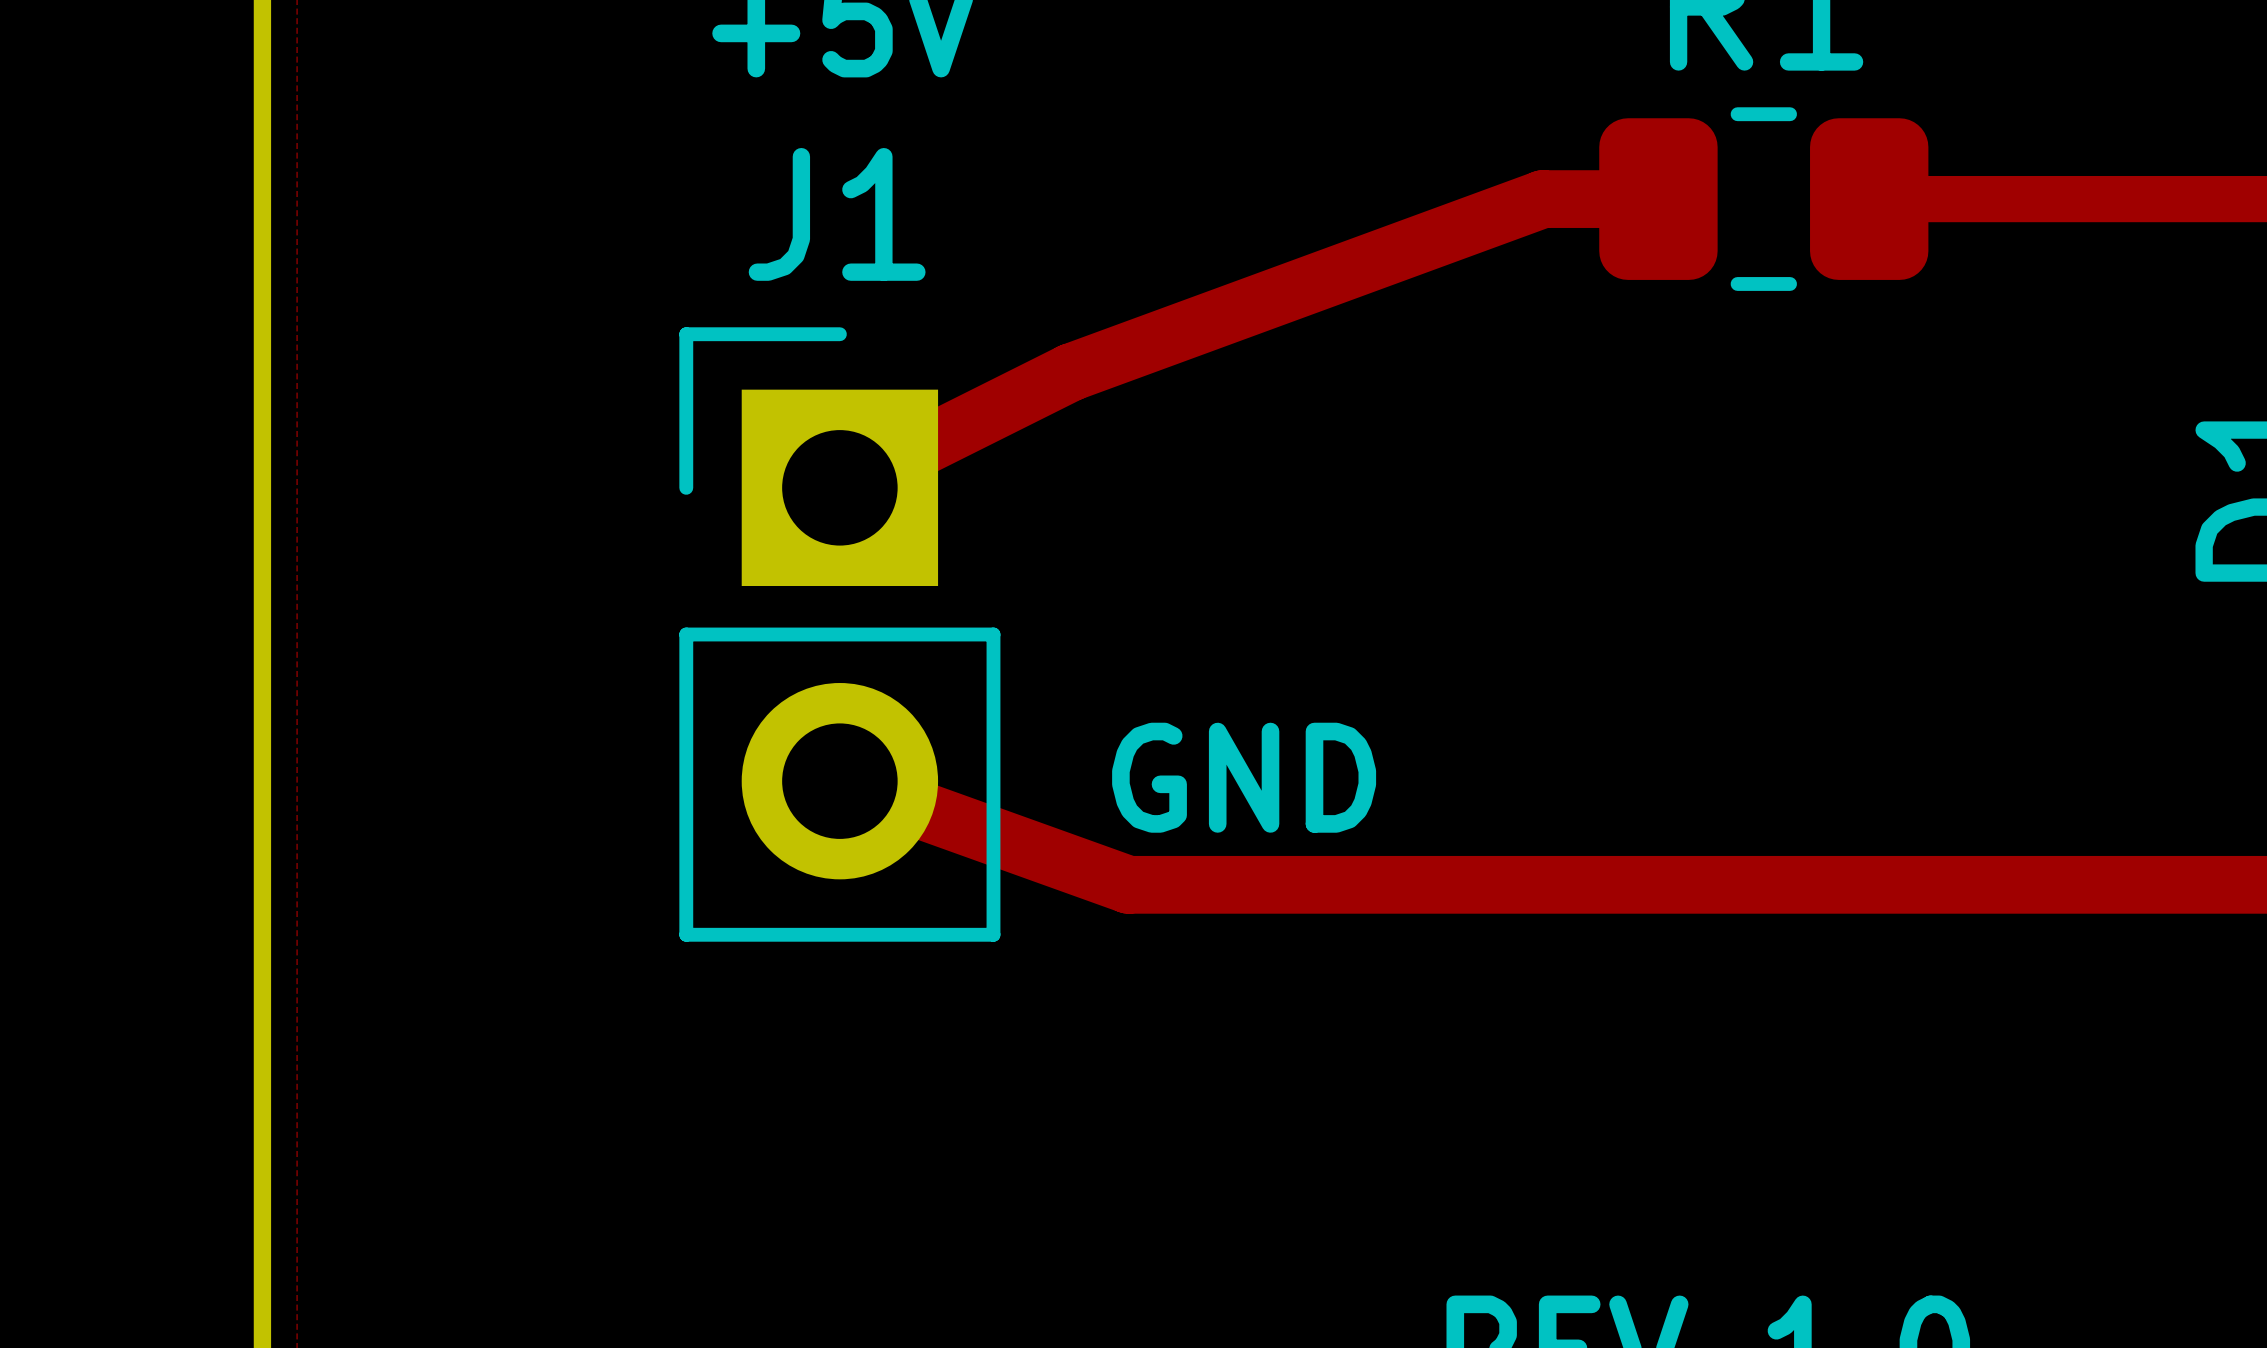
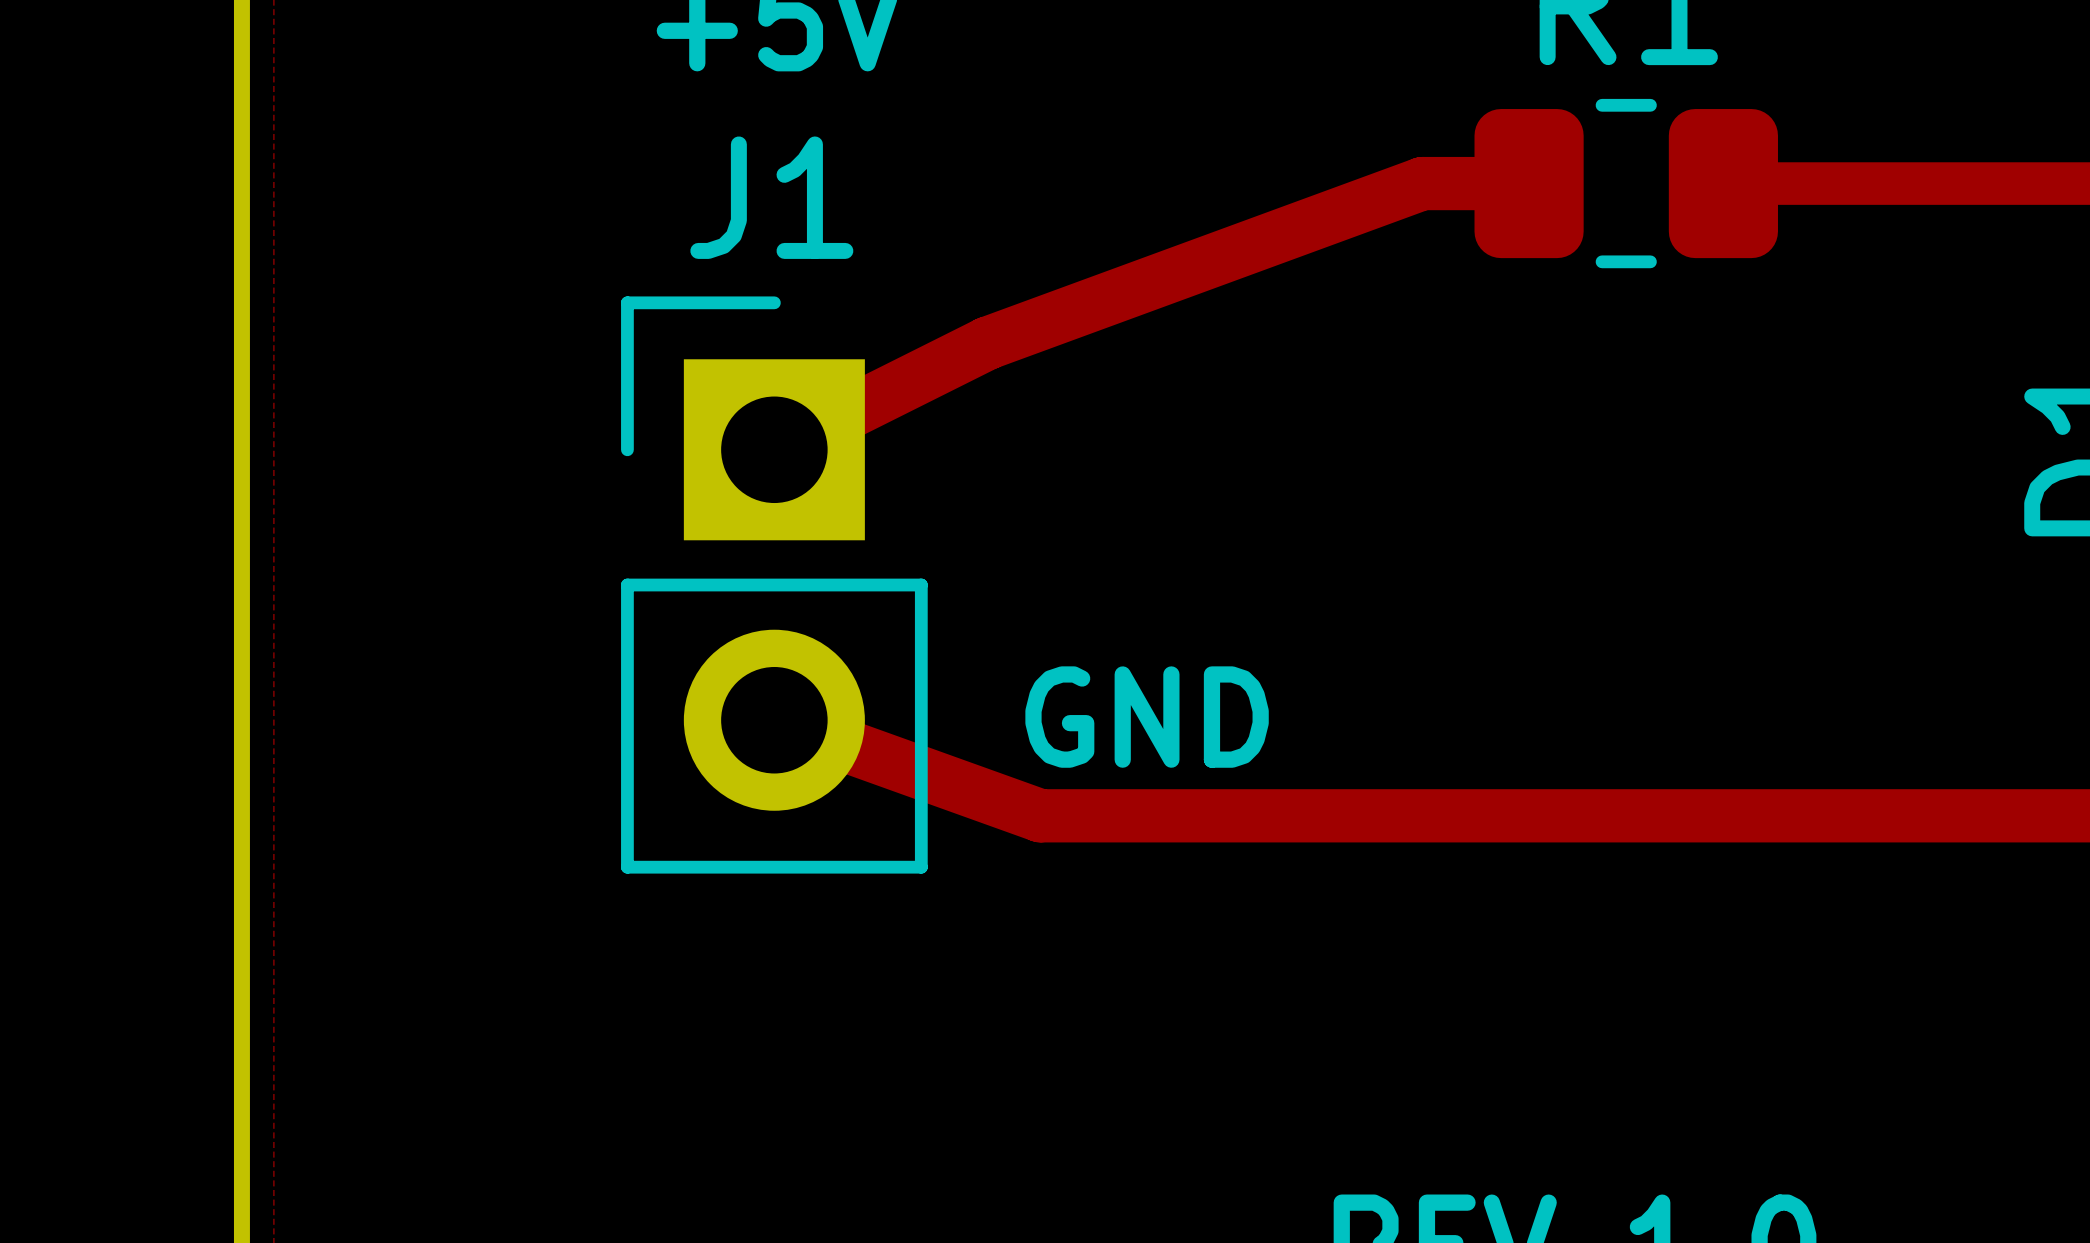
J1 footprint: [679, 327, 1001, 942] -> [621, 296, 928, 874]

